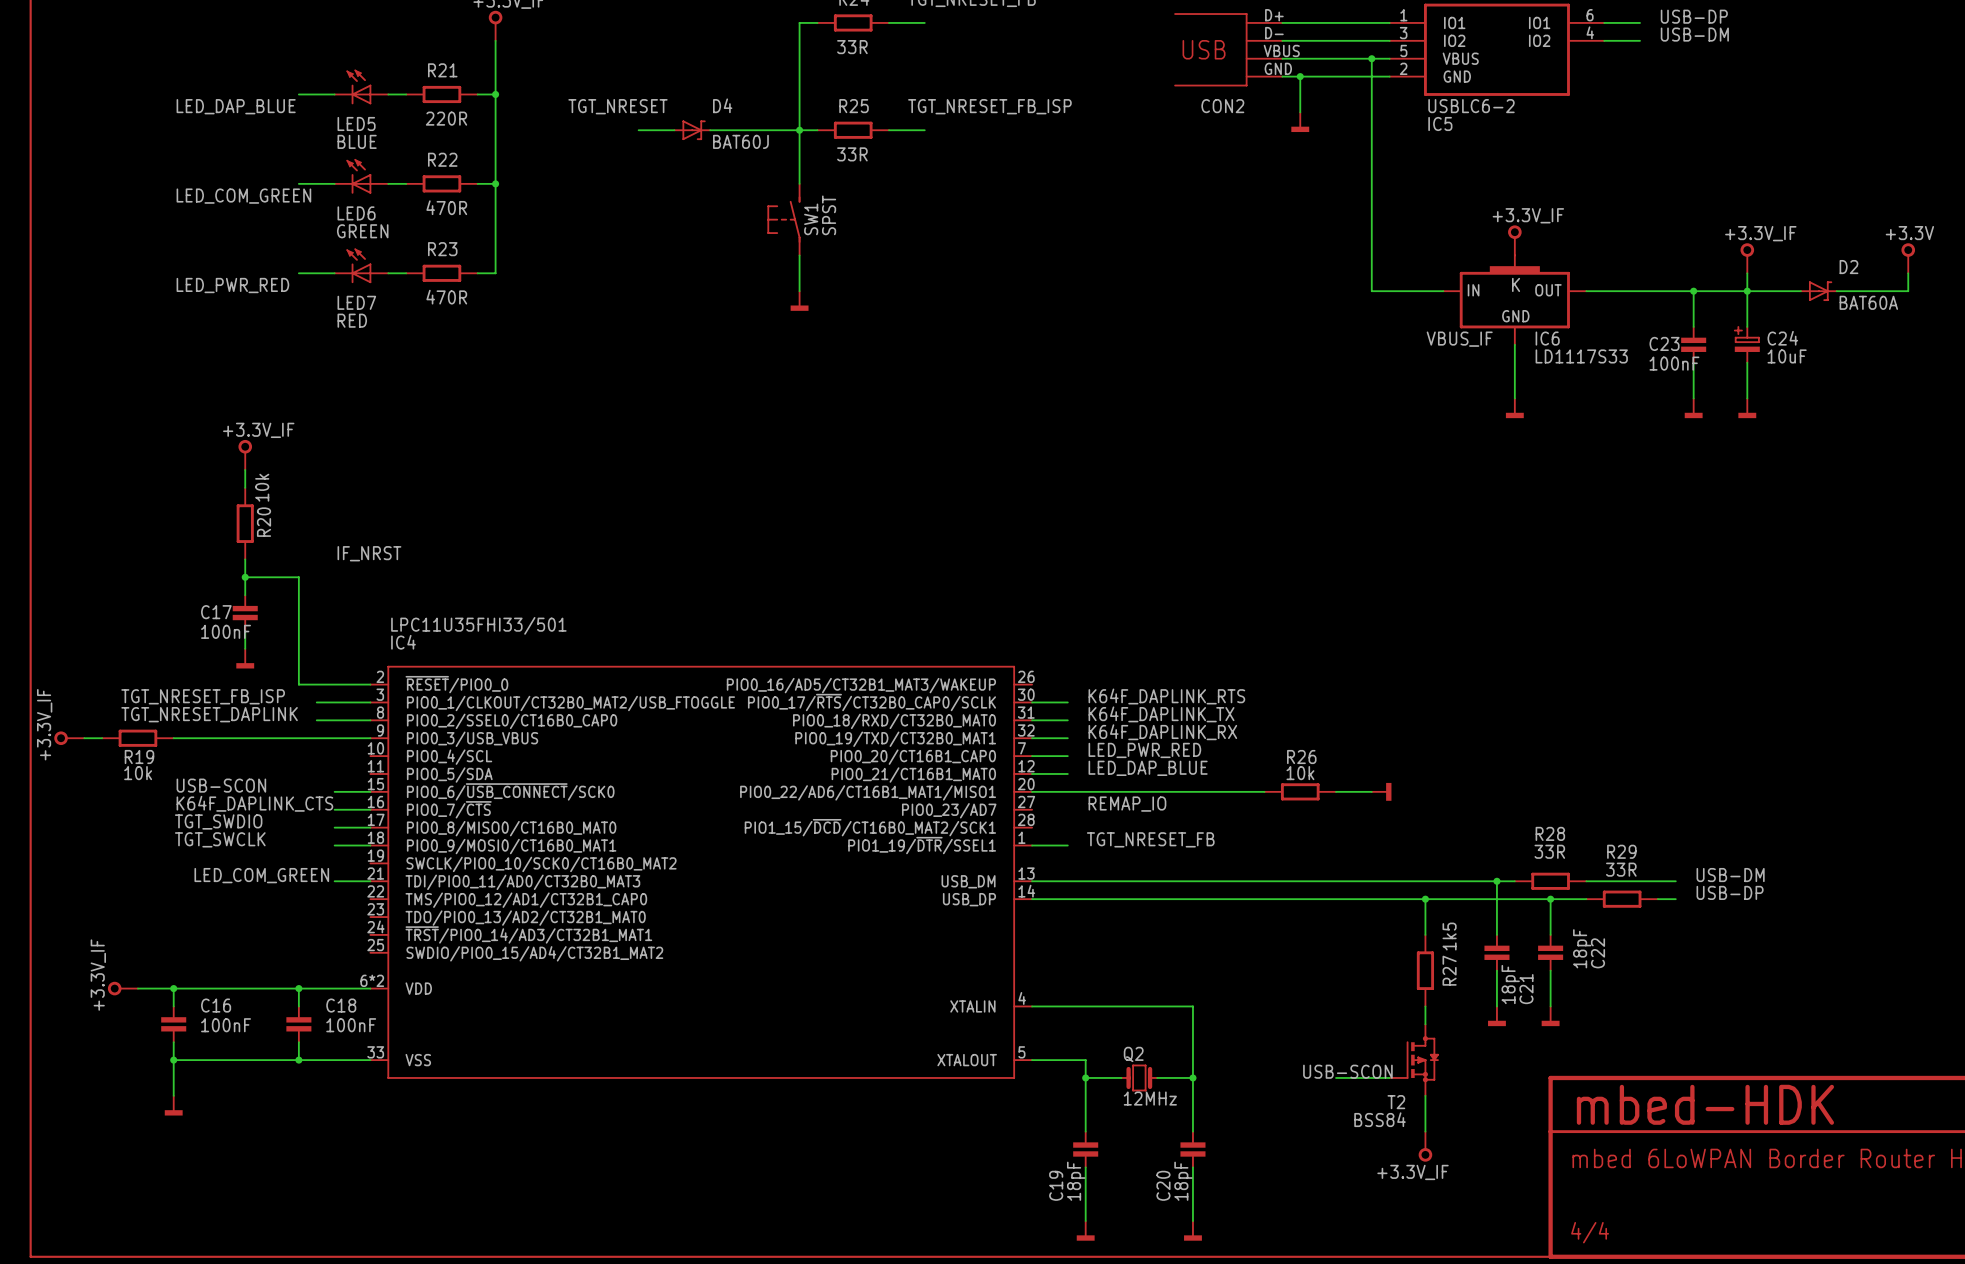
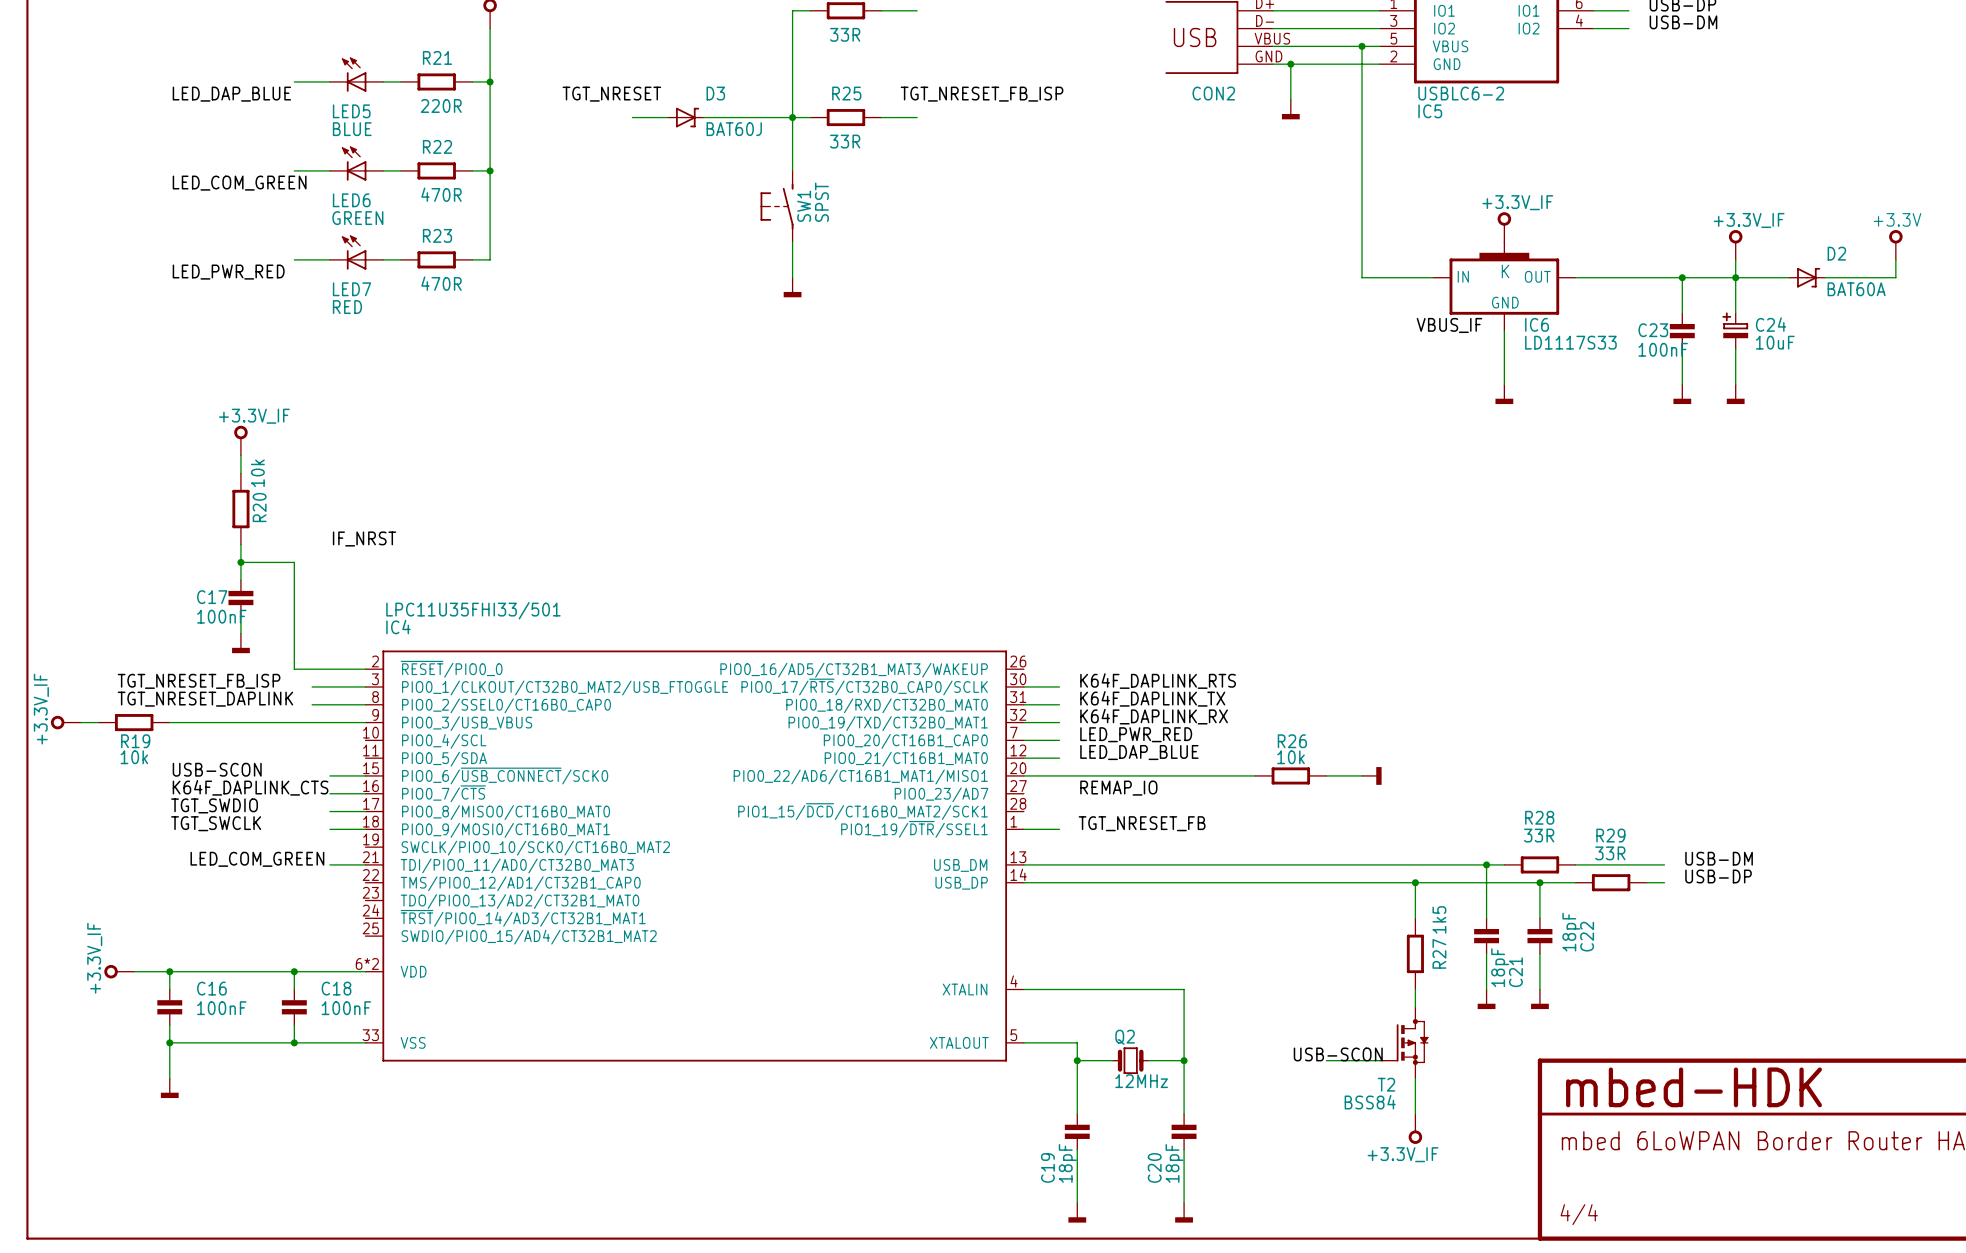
D4 name: D4 (722, 105) -> D3 (715, 93)

